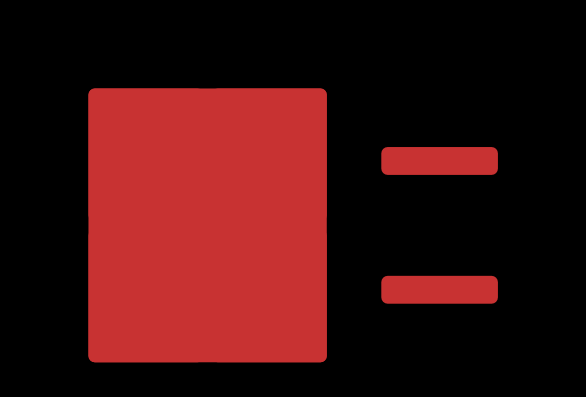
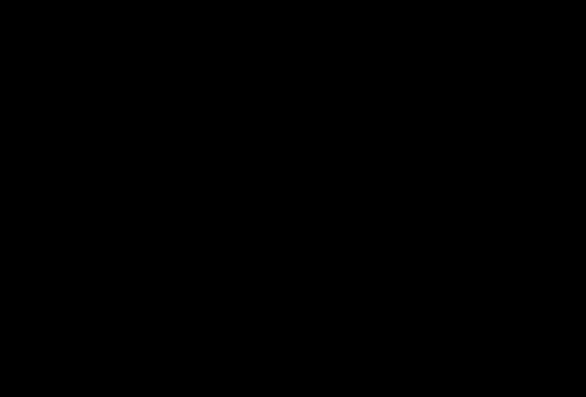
part: (293, 225) -> none

